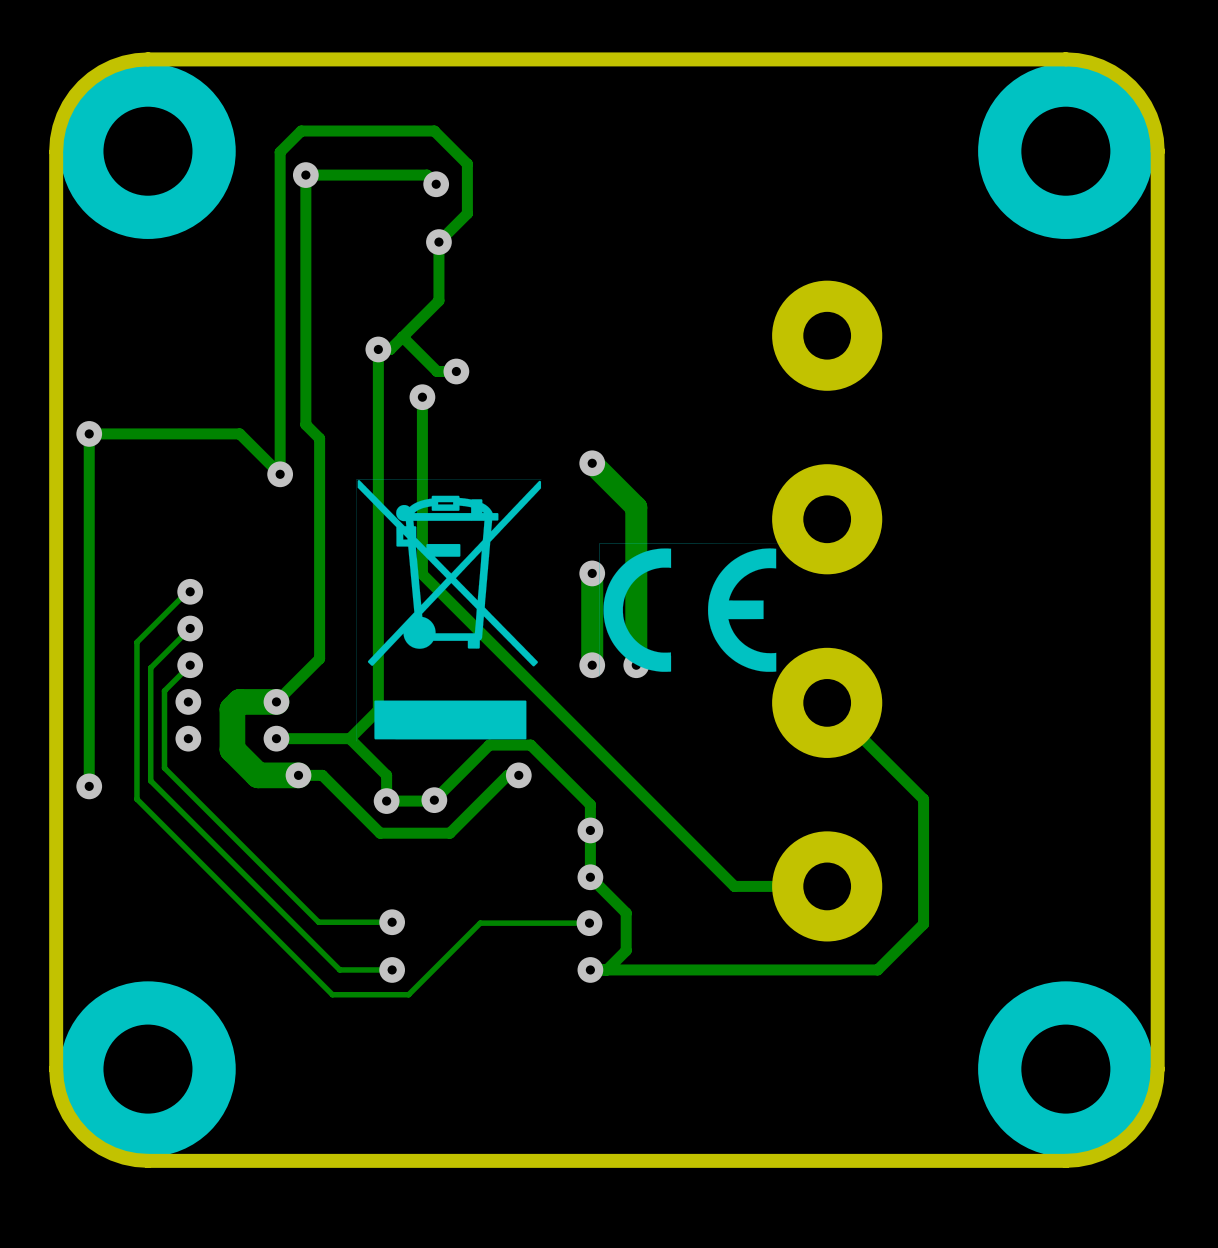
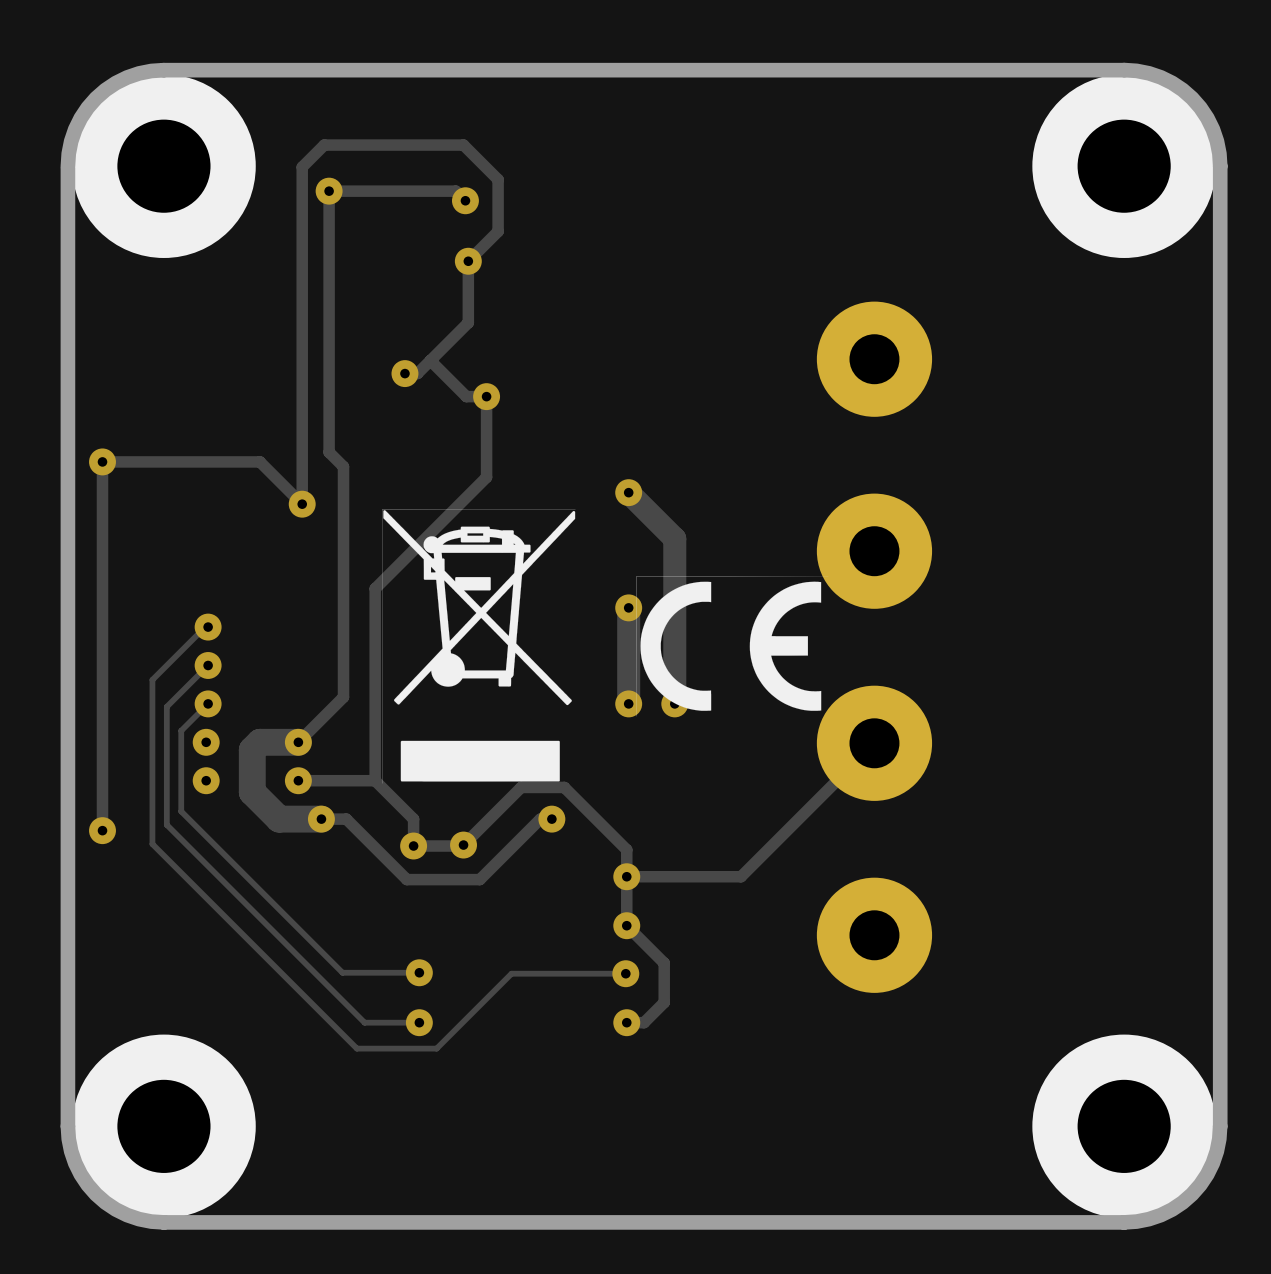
track: (378, 349) (378, 710) (349, 738) -> (486, 396) (486, 477) (375, 588) (375, 780)
track: (422, 397) (422, 574) (734, 886) (827, 886) -> none
via: (422, 397) -> none
track: (827, 702) (923, 799) (923, 924) (877, 969) (606, 969) -> (874, 743) (741, 876) (626, 876)

